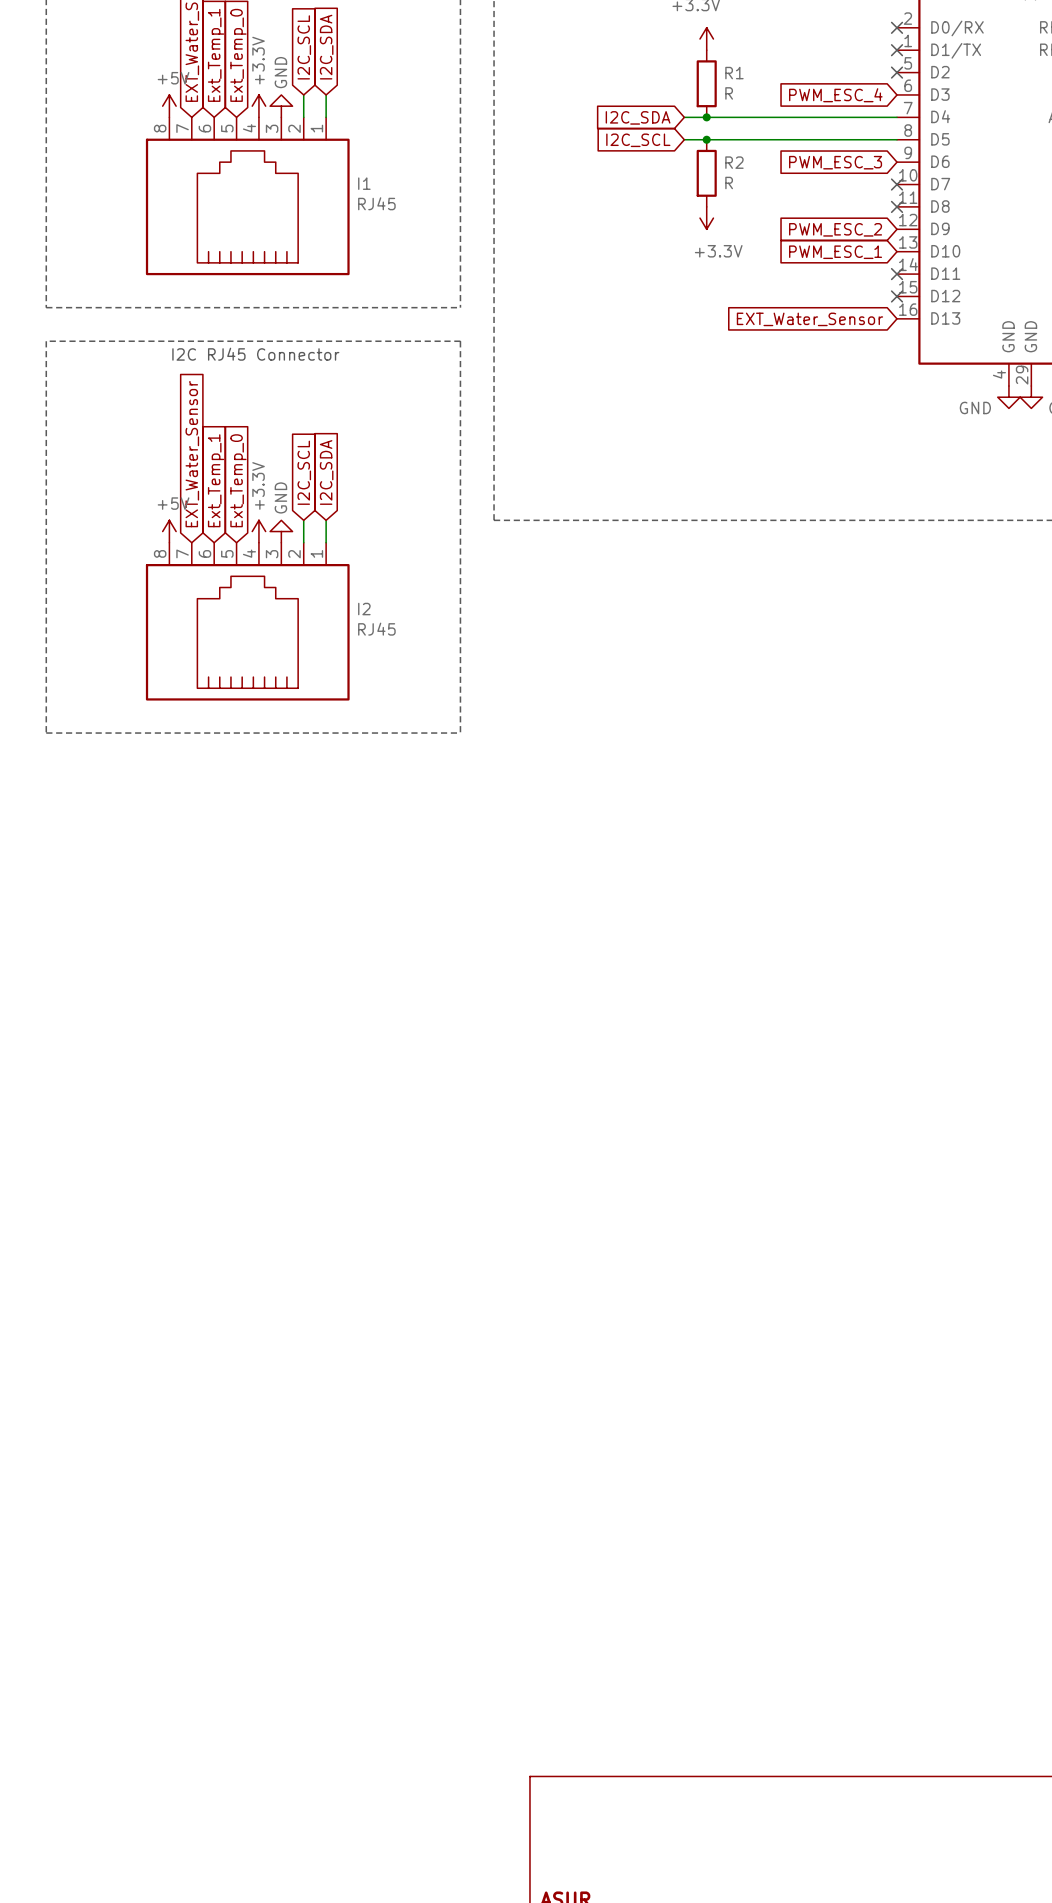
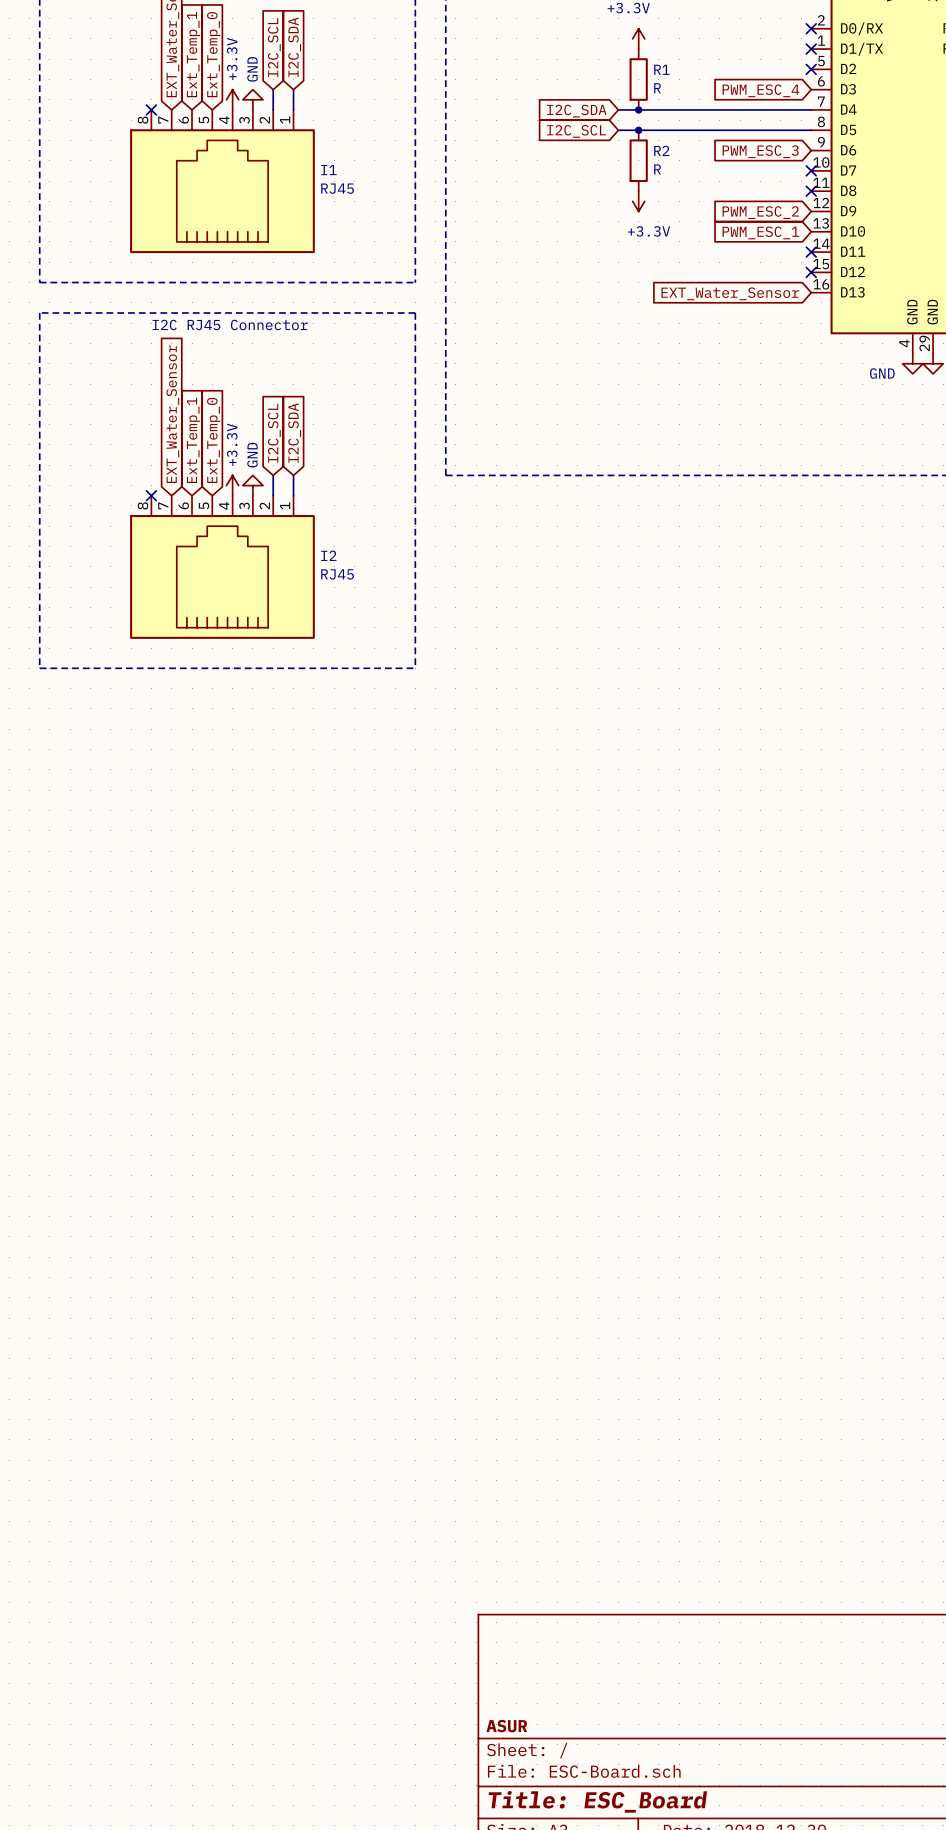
power symbol: +5V (169, 106) -> none
no-connect mark: none -> (151, 109)
power symbol: +5V (169, 531) -> none
no-connect mark: none -> (151, 495)

